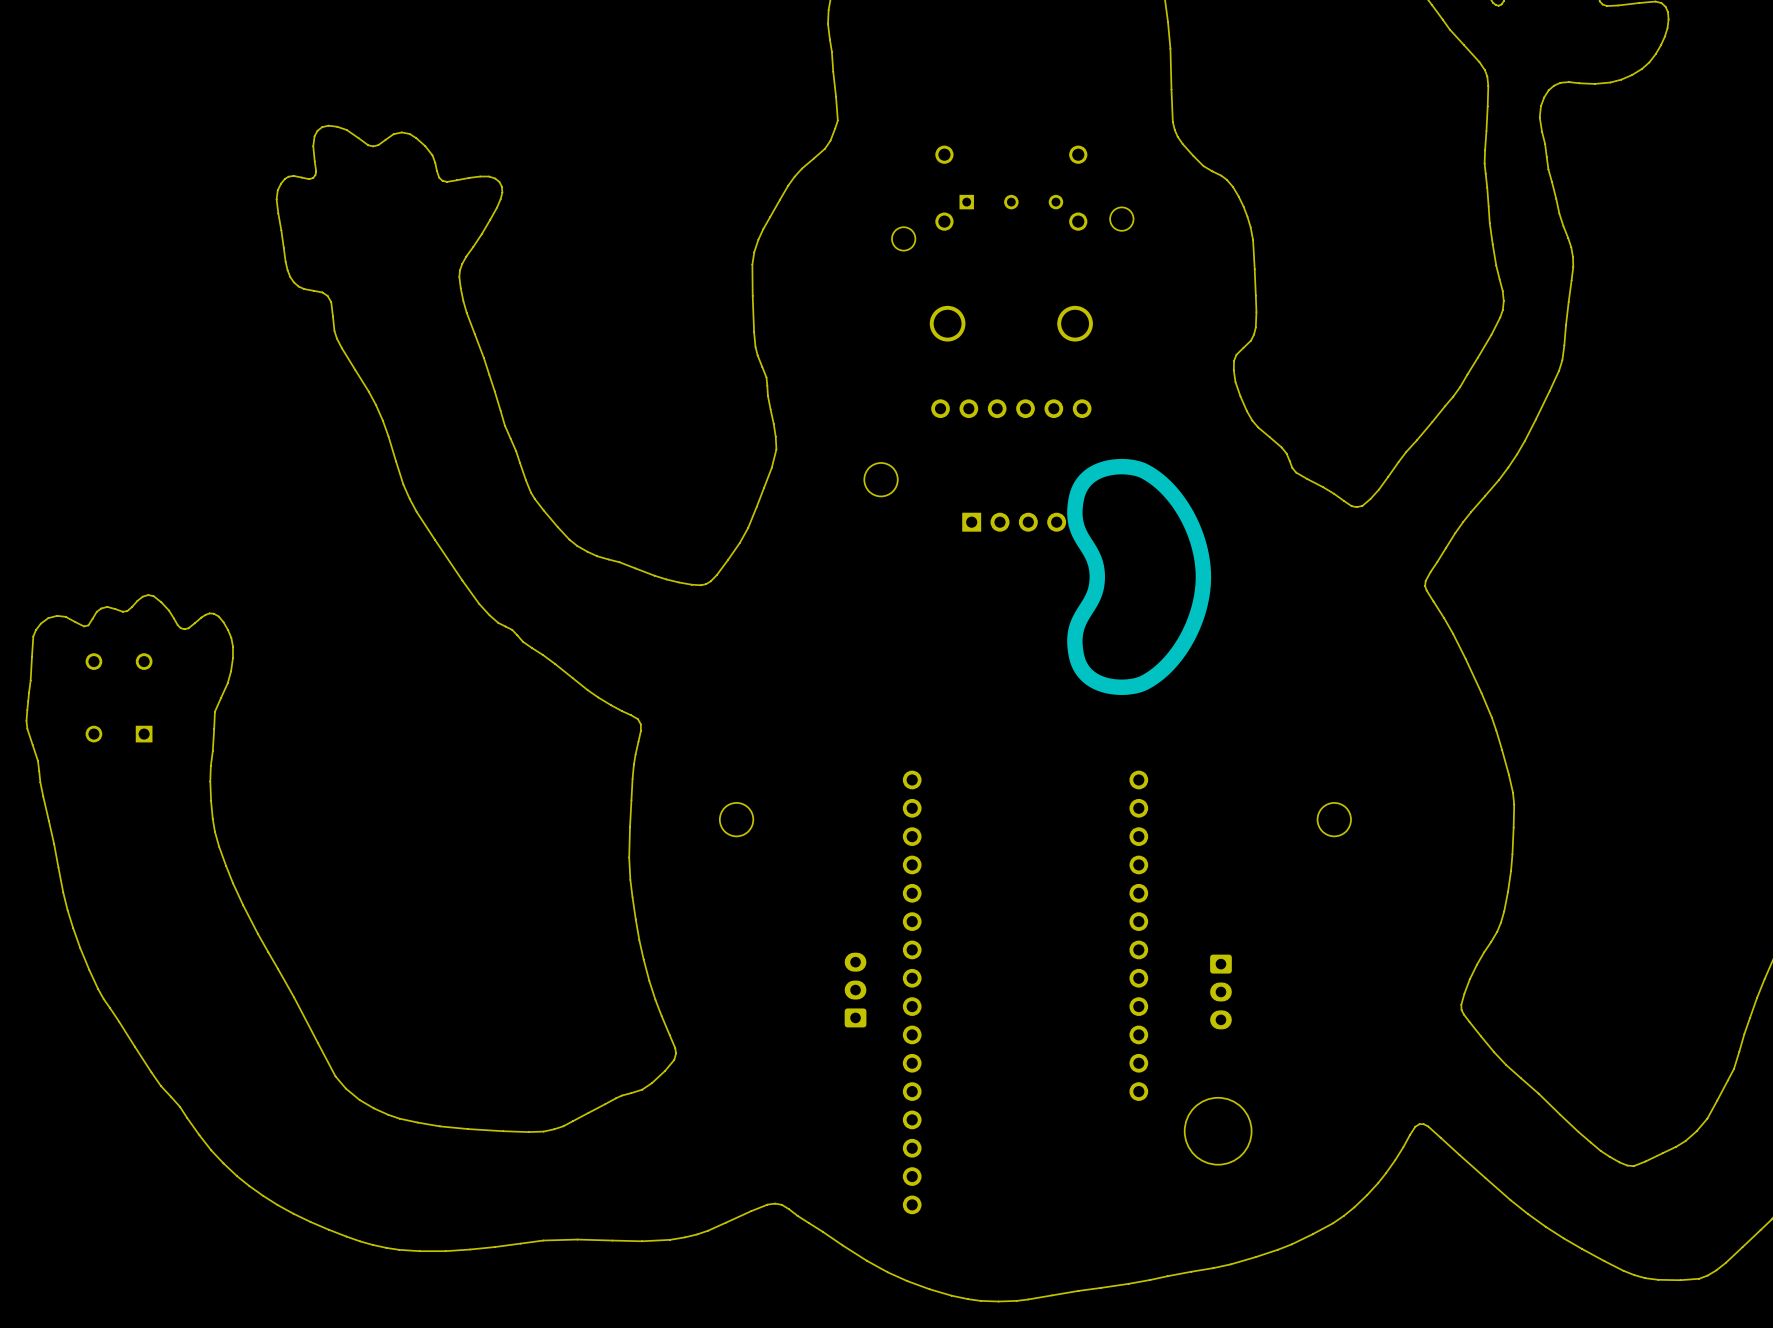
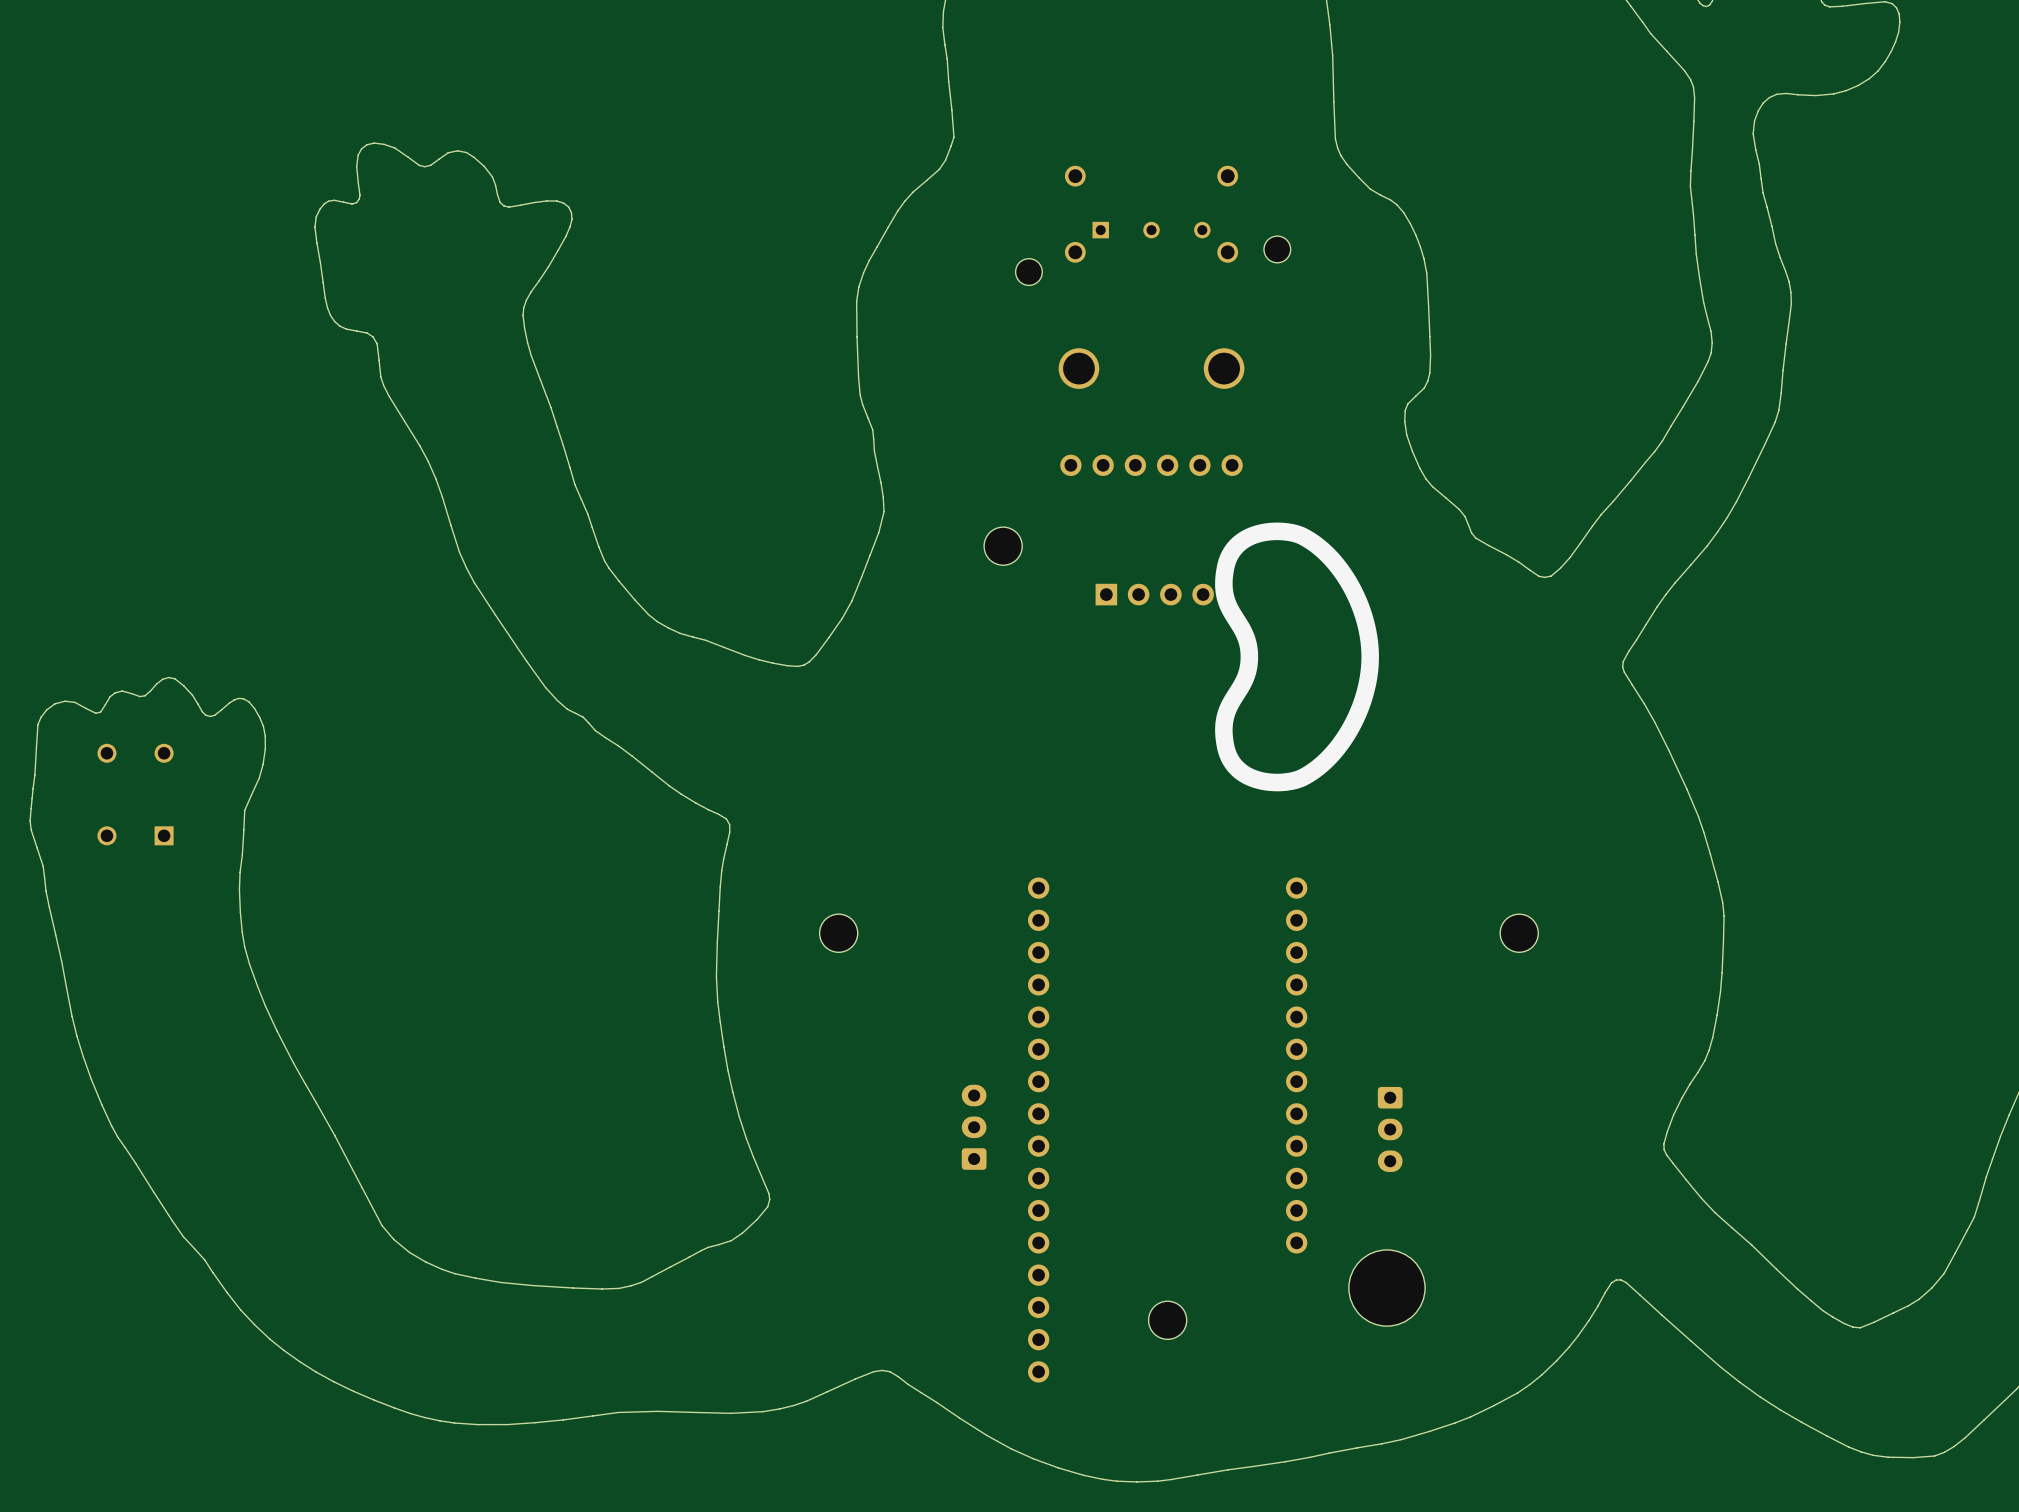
part: none -> (1167, 1320)

